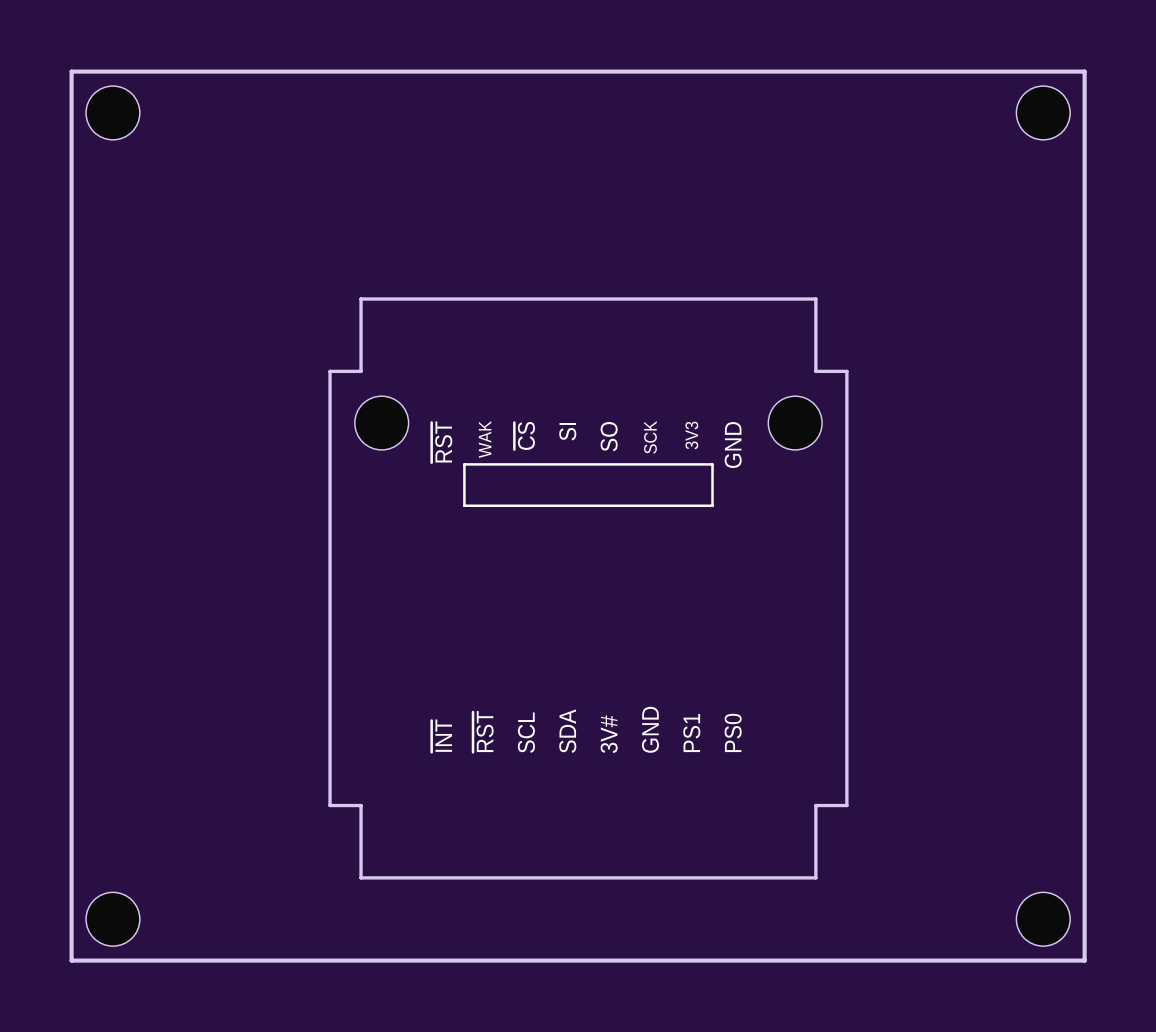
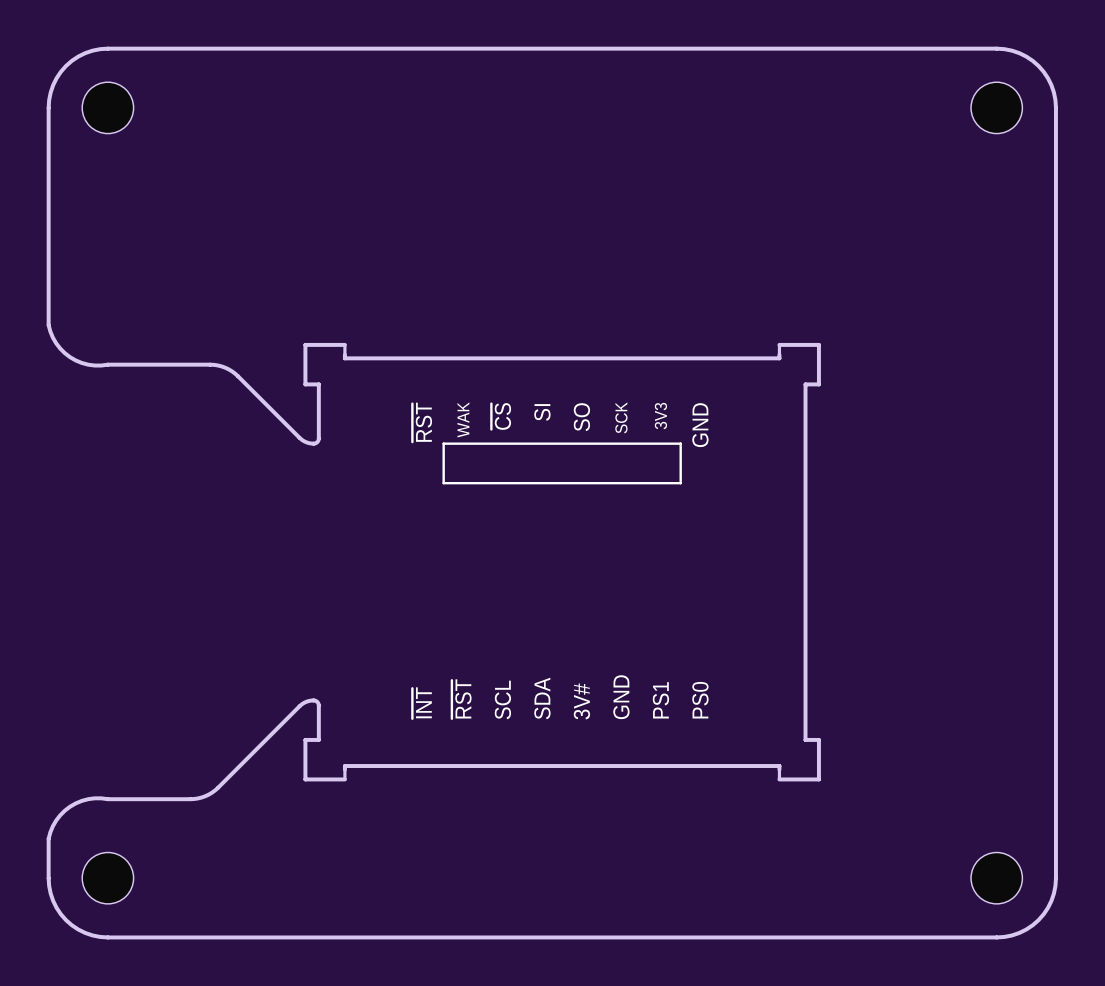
board edge: (1084, 71) (71, 71) (71, 960) (1084, 960) (1084, 71) -> none
board edge: (815, 361) (815, 299) (361, 299) (361, 361) -> (779, 344) (818, 344) (818, 384) (805, 384) (805, 739) (818, 739) (818, 779) (779, 779)
board edge: (361, 371) (330, 371) (330, 805) (361, 805) -> (779, 769) (779, 766) (344, 766) (344, 769)
board edge: (815, 371) (846, 371) (846, 805) (815, 805) -> (779, 354) (779, 358) (344, 358) (344, 354)
part: (381, 423) -> none
part: (795, 423) -> none
board edge: (815, 815) (815, 877) (361, 877) (361, 815) -> (344, 344) (305, 344) (305, 384) (318, 384) (318, 439) (313, 443) (301, 439) (237, 376) (225, 367) (210, 364) (94, 365) (75, 360) (60, 348) (52, 337) (48, 325) (48, 107) (53, 85) (66, 66) (85, 53) (107, 48) (996, 48) (1012, 50) (1026, 56) (1043, 71) (1051, 85) (1055, 107) (1055, 878) (1051, 900) (1038, 920) (1019, 932) (996, 937) (107, 937) (92, 935) (78, 929) (60, 914) (53, 900) (49, 885) (48, 838) (52, 826) (64, 810) (75, 803) (94, 798) (190, 799) (205, 796) (218, 787) (306, 701) (314, 700) (318, 704) (318, 739) (305, 739) (305, 779) (344, 779)

